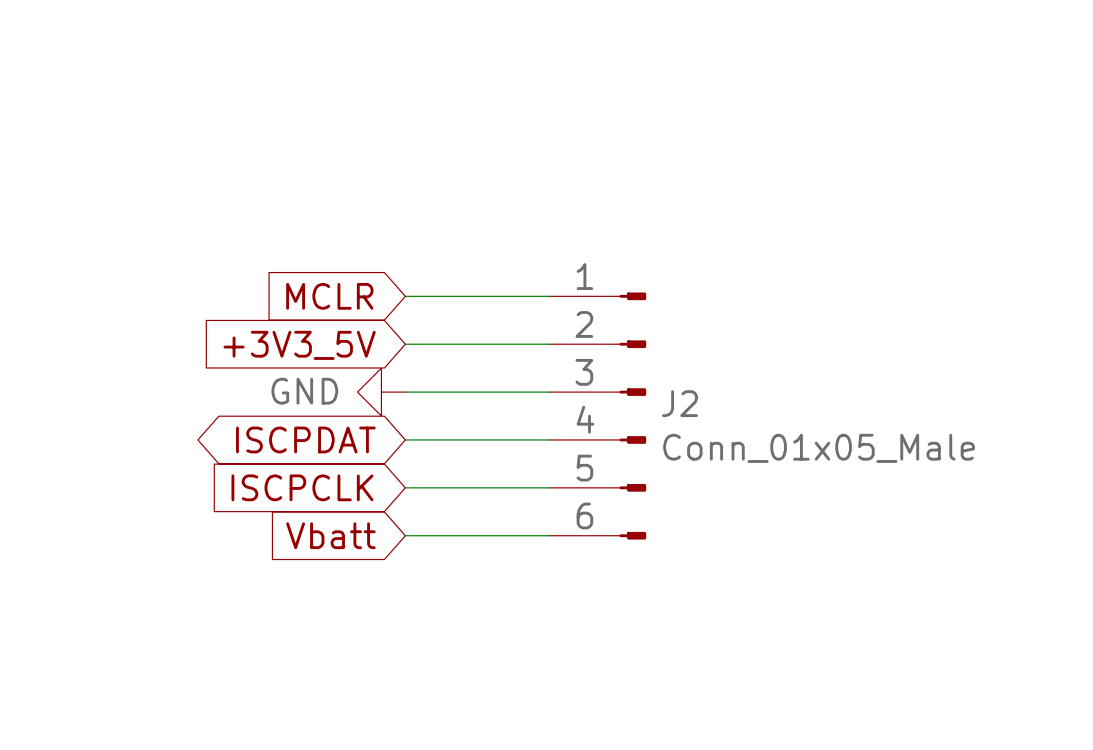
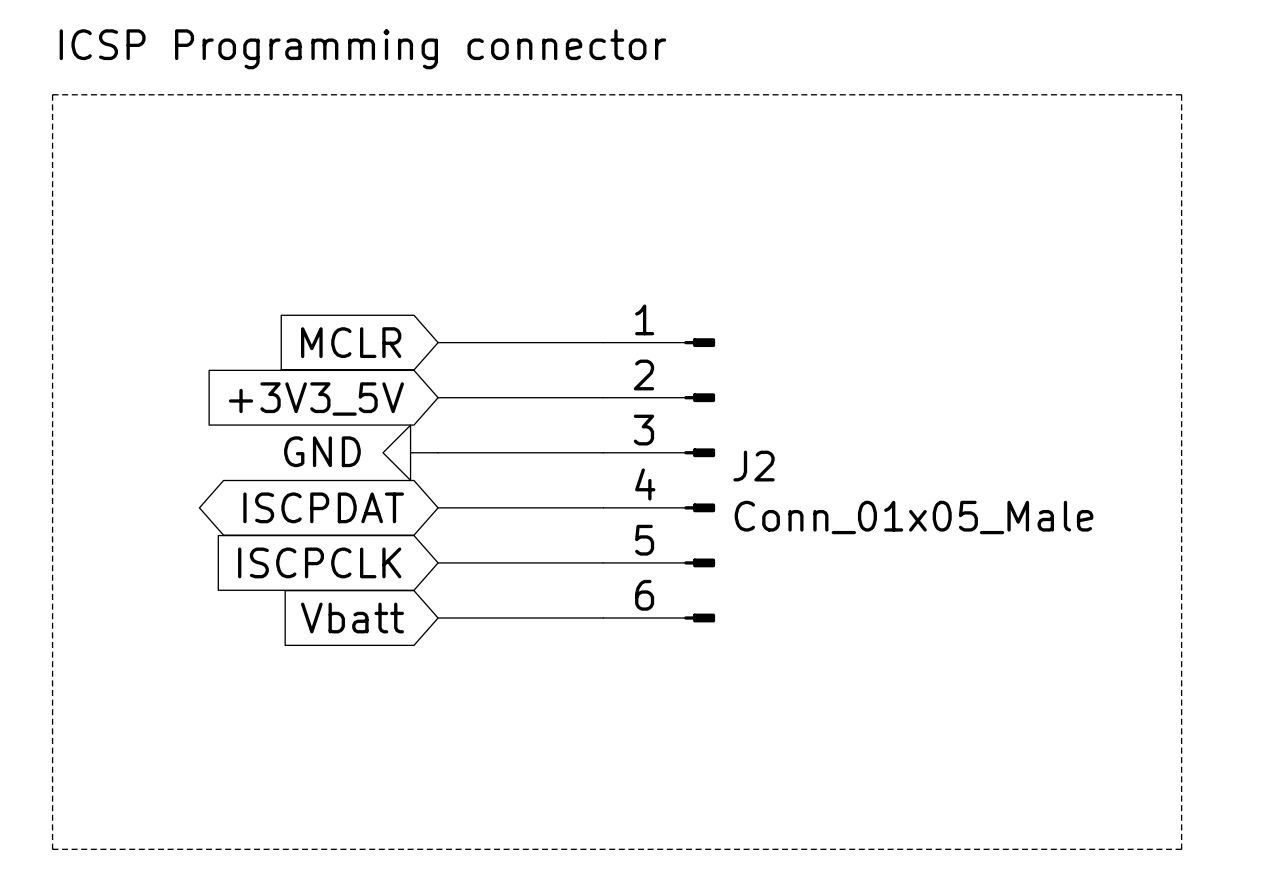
text: none -> ICSP Programming connector (362, 49)
line: none -> (52, 94) (1181, 94) (1181, 849) (52, 849) (52, 94)

